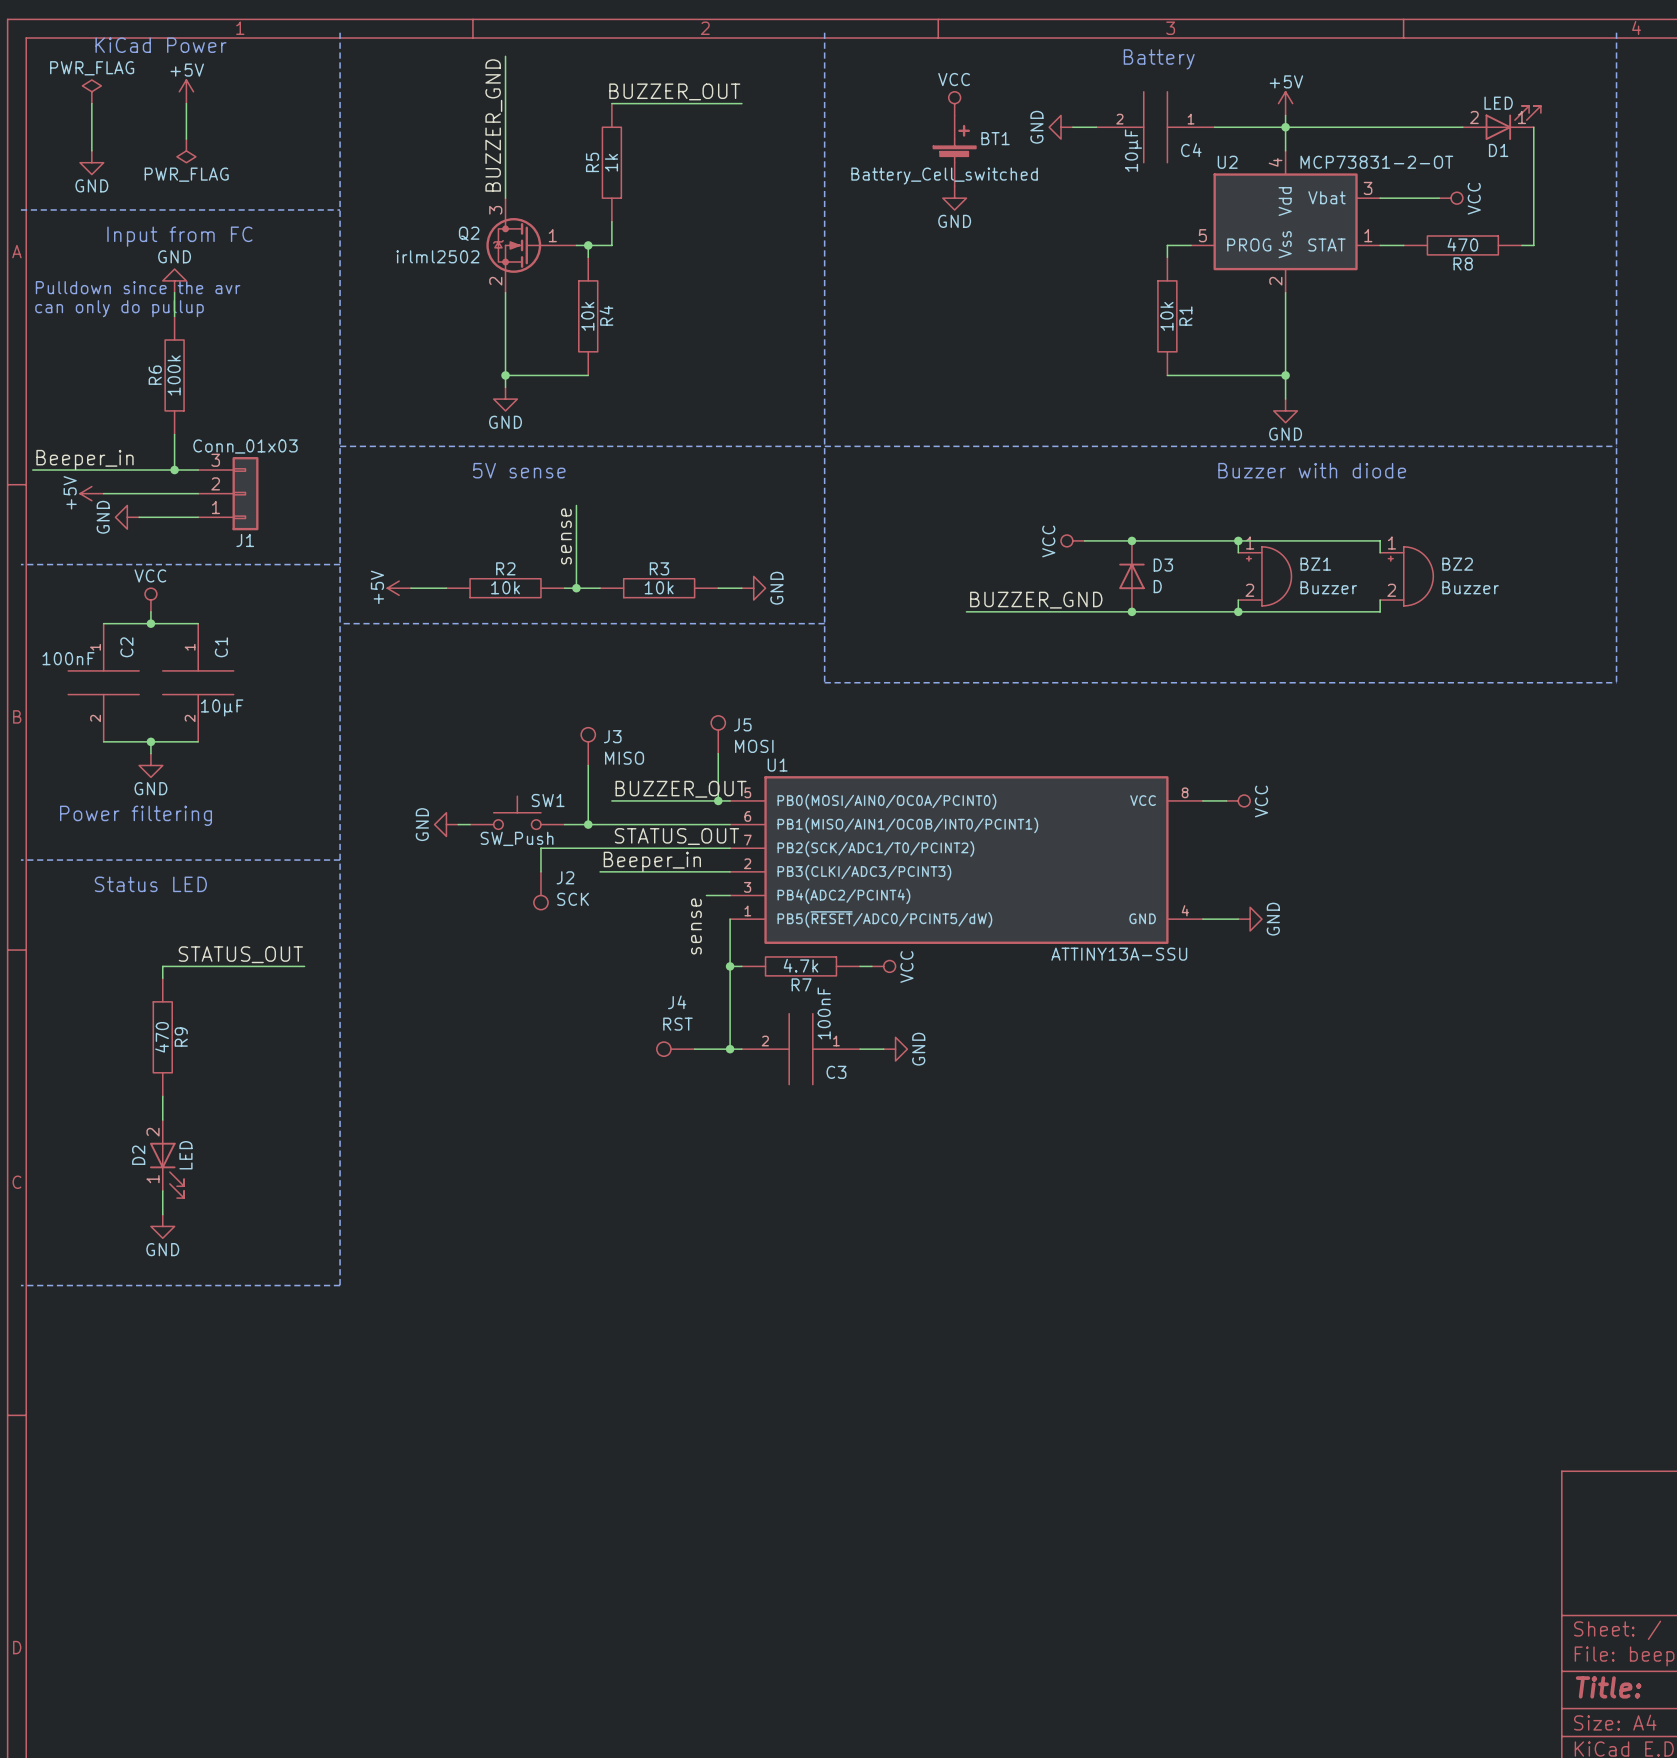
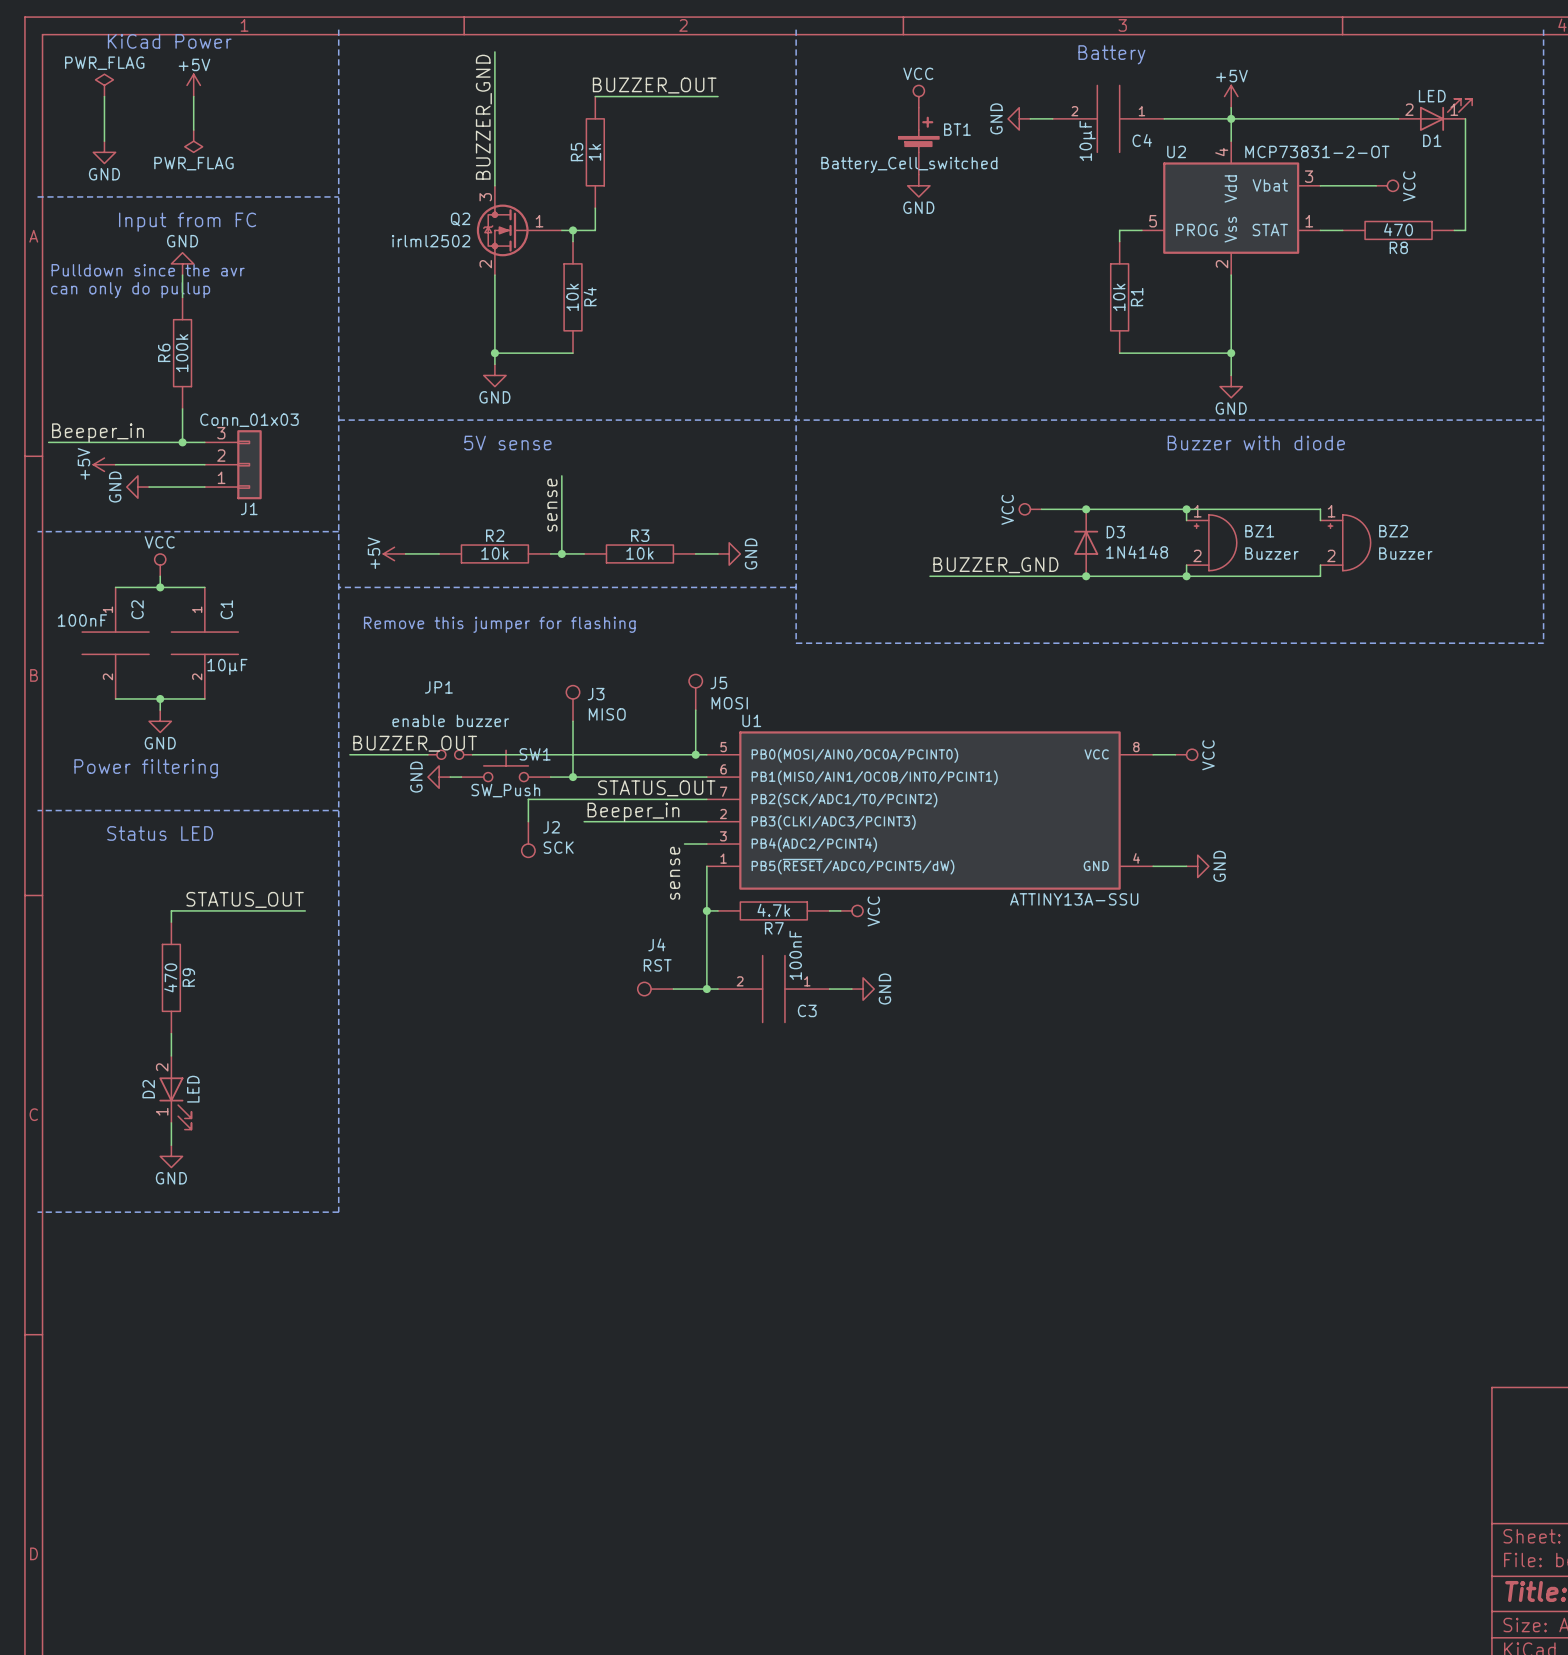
D3 value: D (1157, 586) -> 1N4148 (1137, 552)
text: none -> Remove this jumper for flashing (499, 624)
label: none -> BUZZER_OUT (415, 743)
label: BUZZER_OUT (681, 789) -> none
wire: none -> (349, 754) (427, 754)
JP1: none -> enable buzzer (450, 754)
wire: none -> (472, 754) (595, 754)

